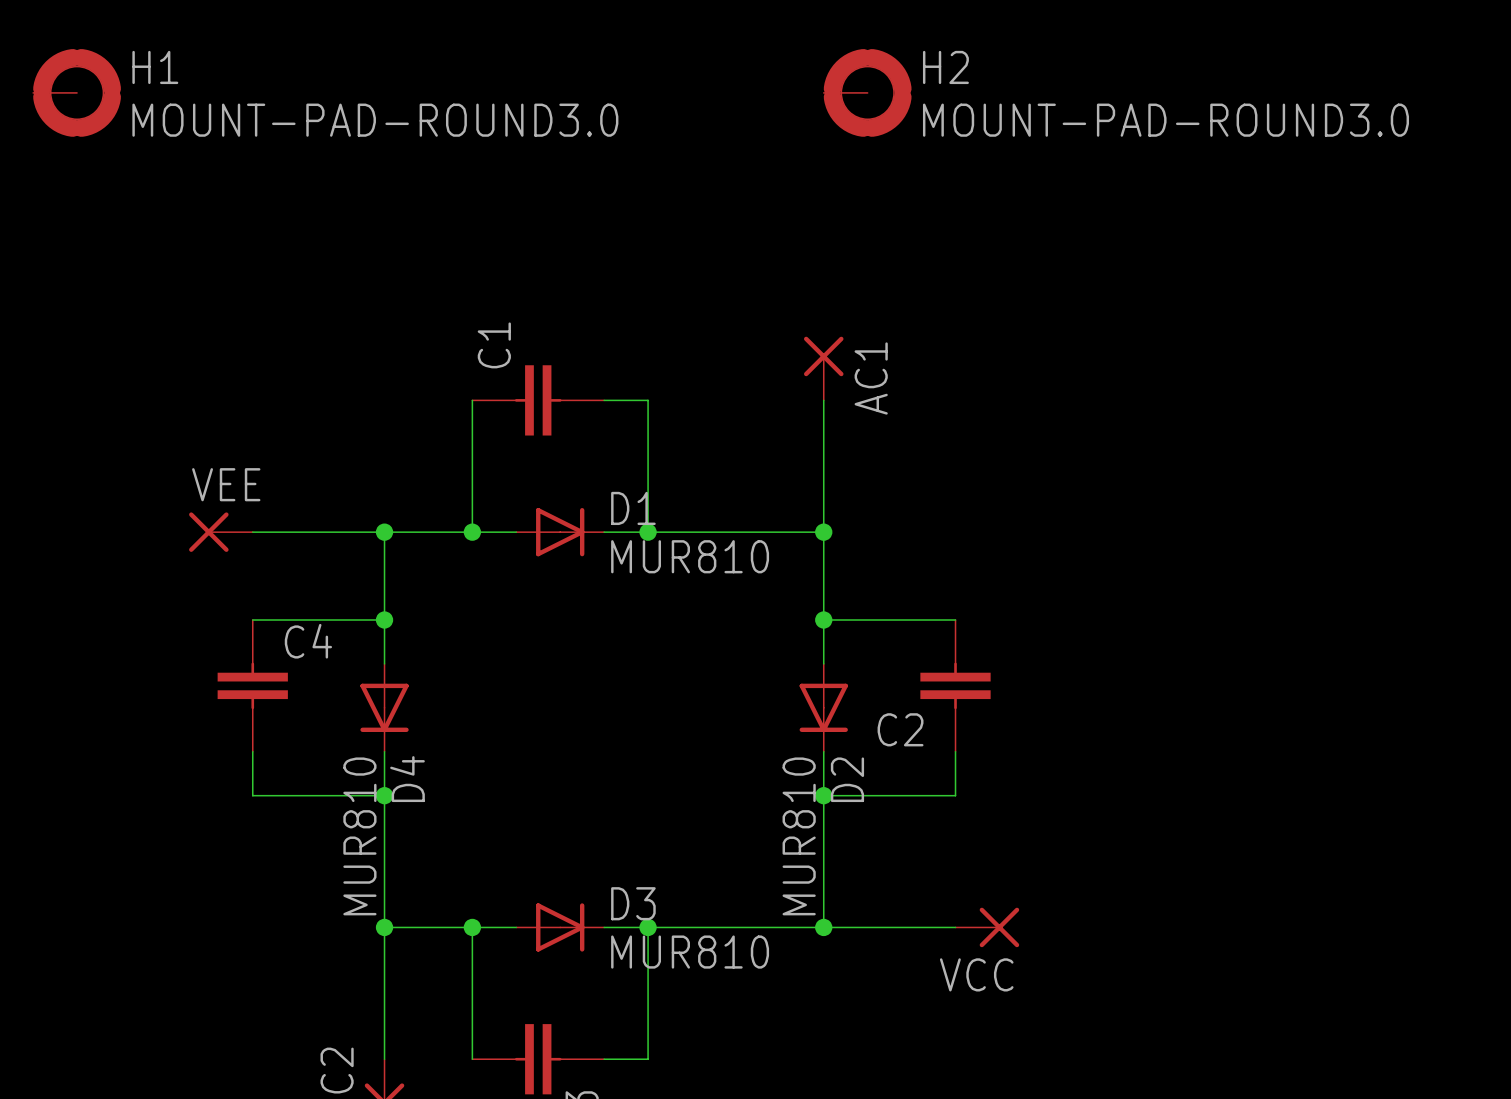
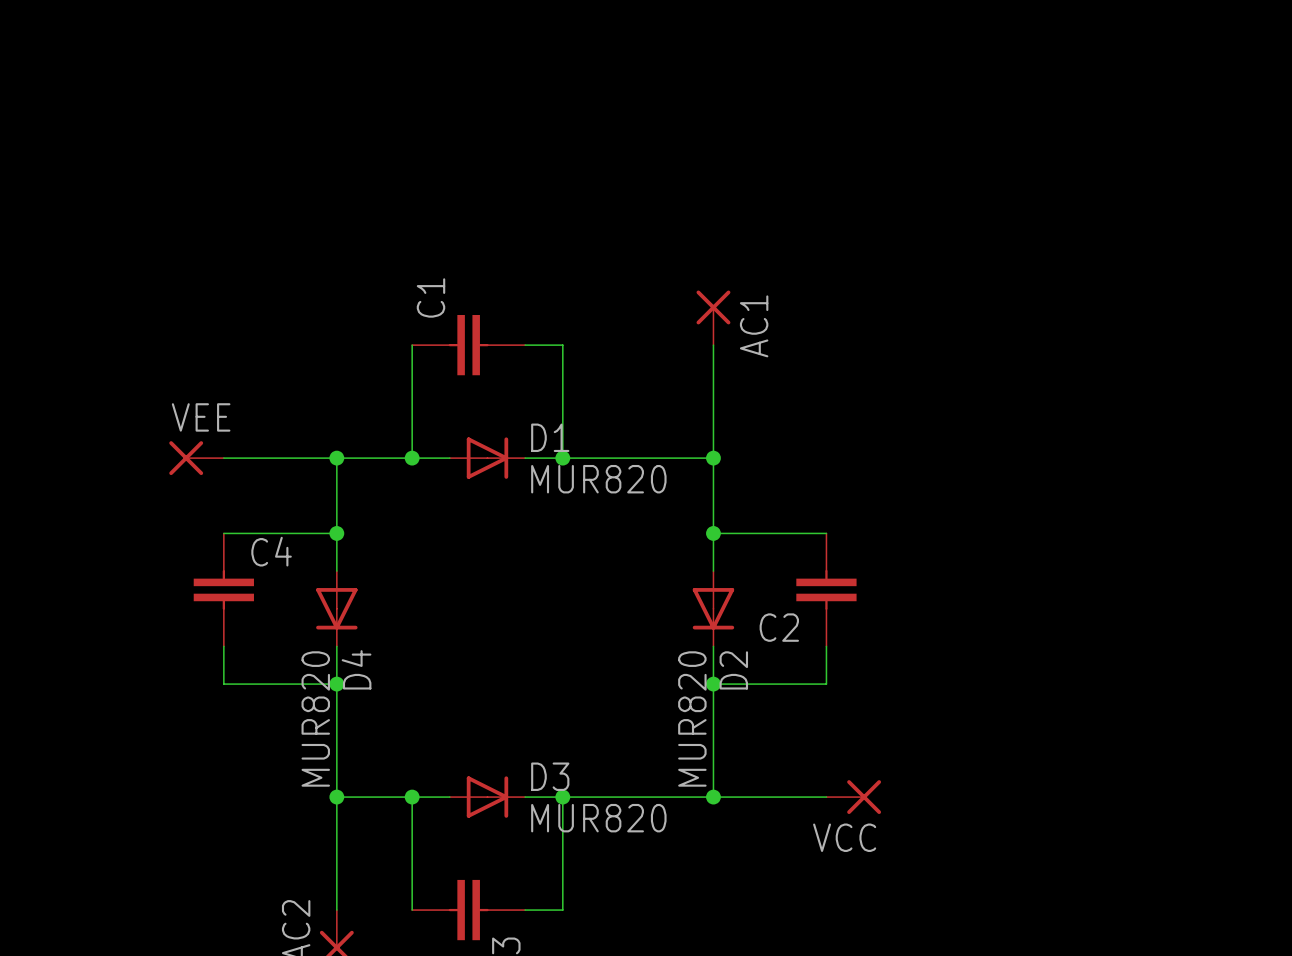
H1: MOUNT-PAD-ROUND3.0 (77, 92) -> none
H2: MOUNT-PAD-ROUND3.0 (867, 92) -> none
D1 value: MUR810 (690, 556) -> MUR820 (598, 479)
D4 value: MUR810 (359, 836) -> MUR820 (315, 718)
D2 value: MUR810 (799, 836) -> MUR820 (692, 718)
D3 value: MUR810 (690, 952) -> MUR820 (598, 818)

